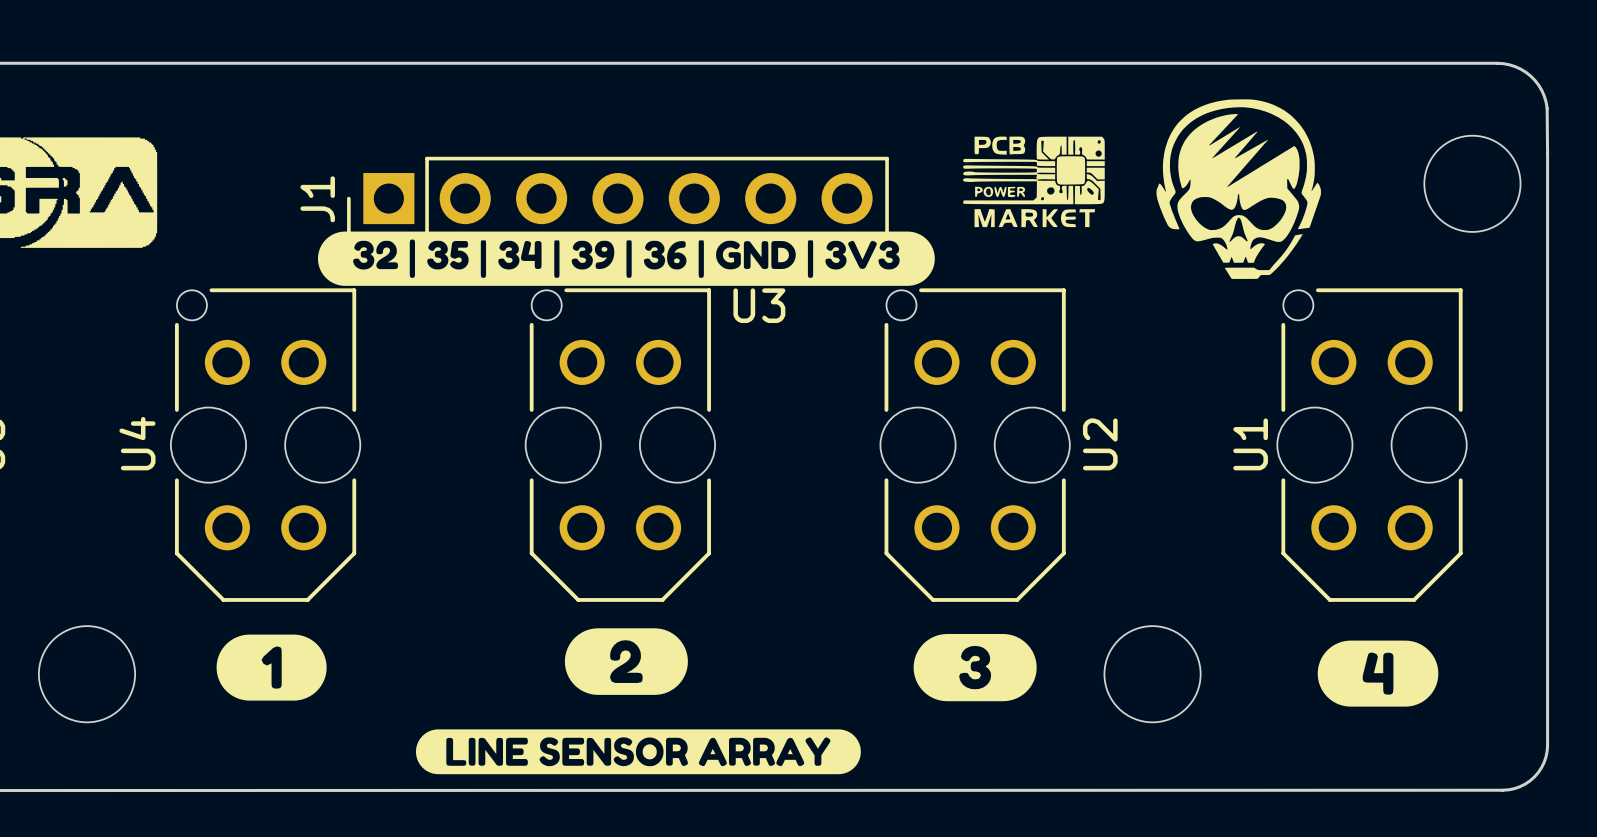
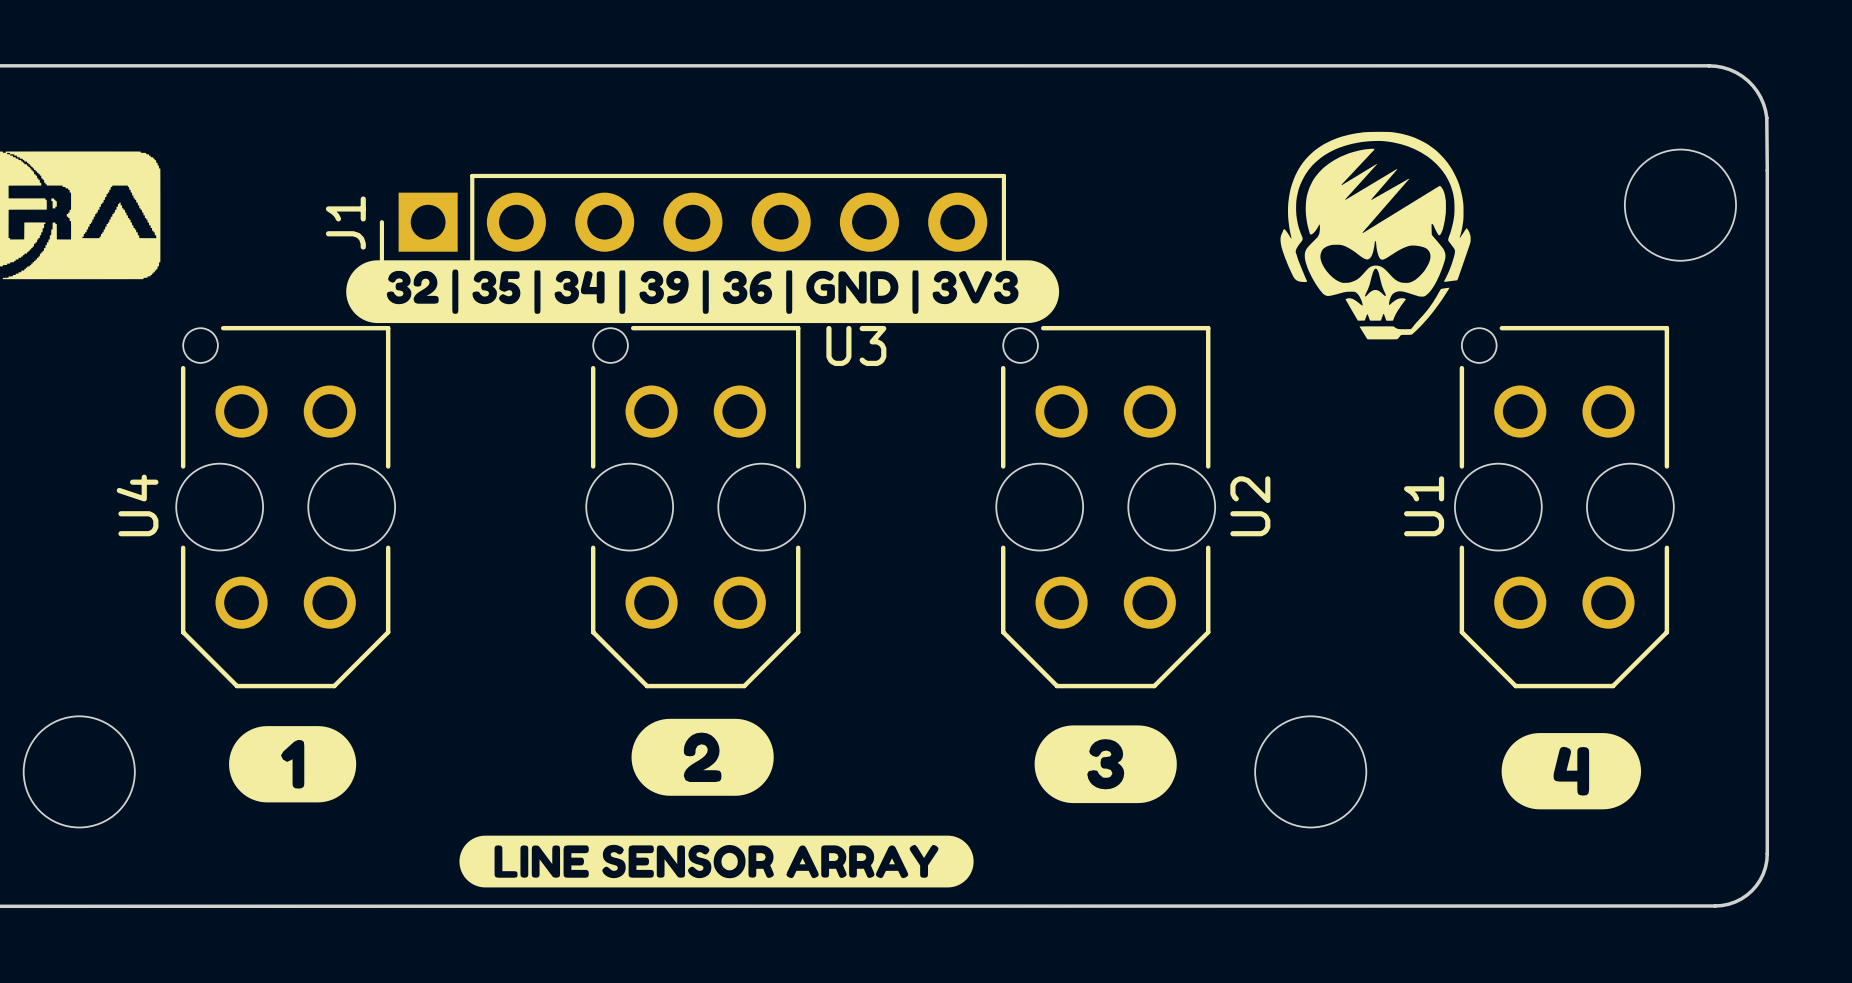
part: (1033, 181) -> none
drawing position: (1238, 189) -> (1375, 235)

